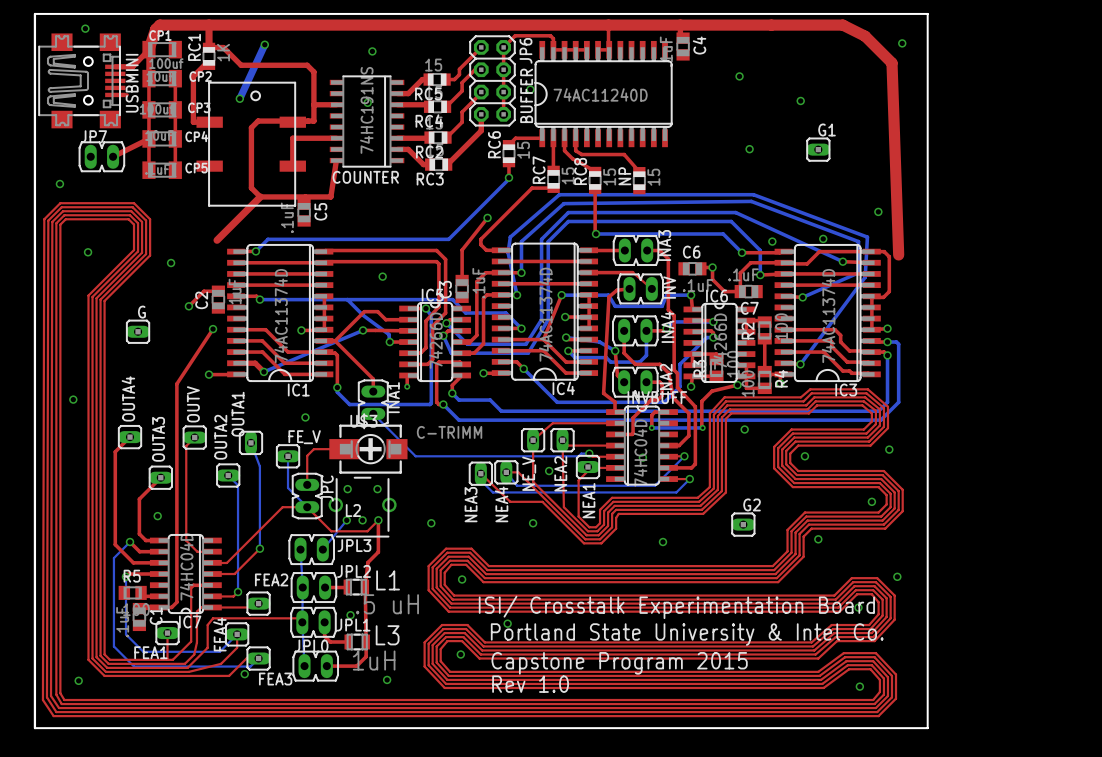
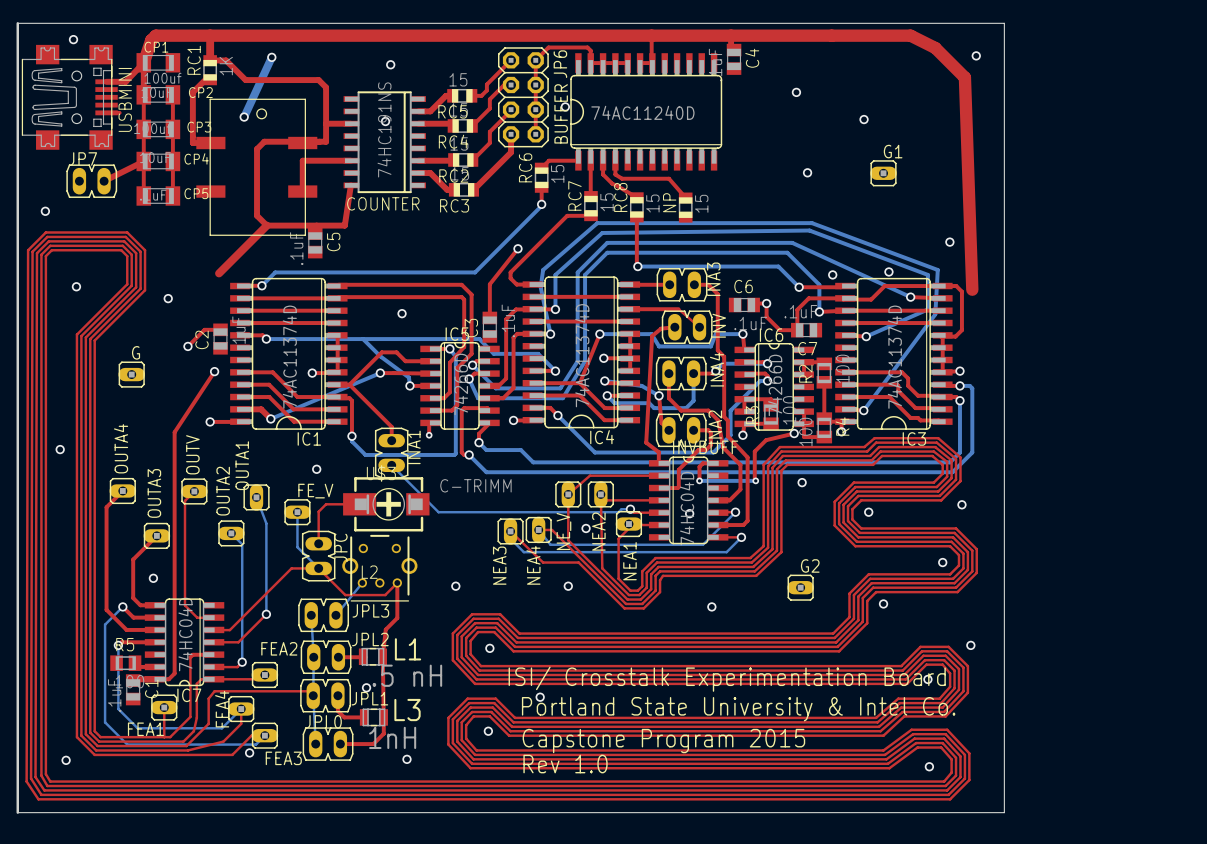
L1 value: .5 uH (387, 604) -> .5 nH (407, 675)
L3 value: 1uH (374, 660) -> 1nH (392, 737)

